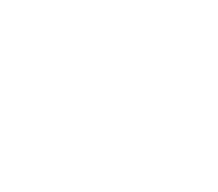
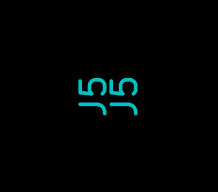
drawing: none -> [78, 77, 138, 116]

